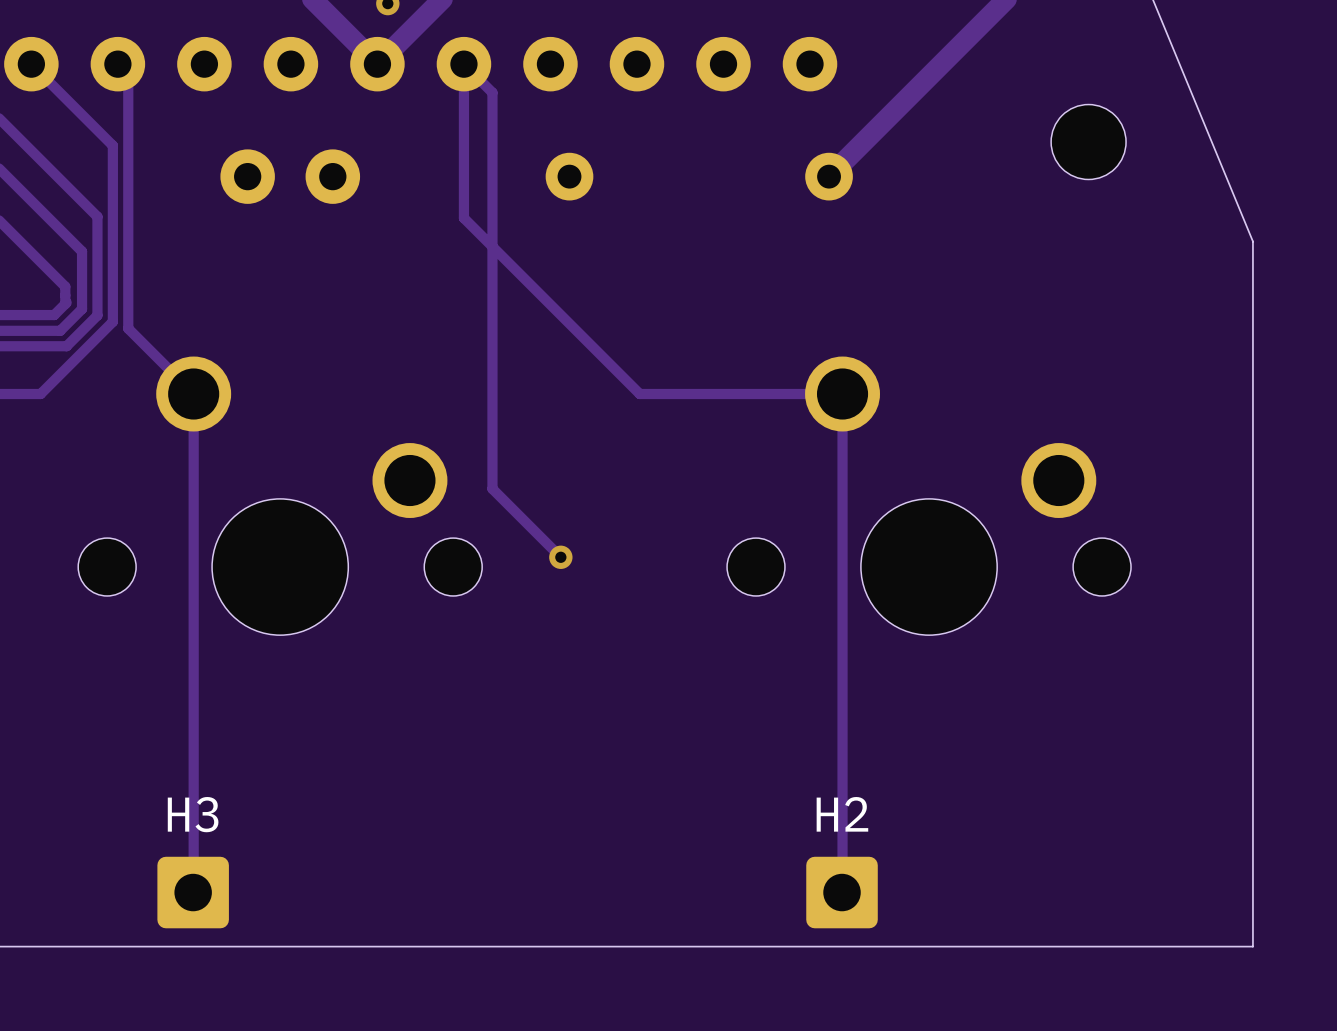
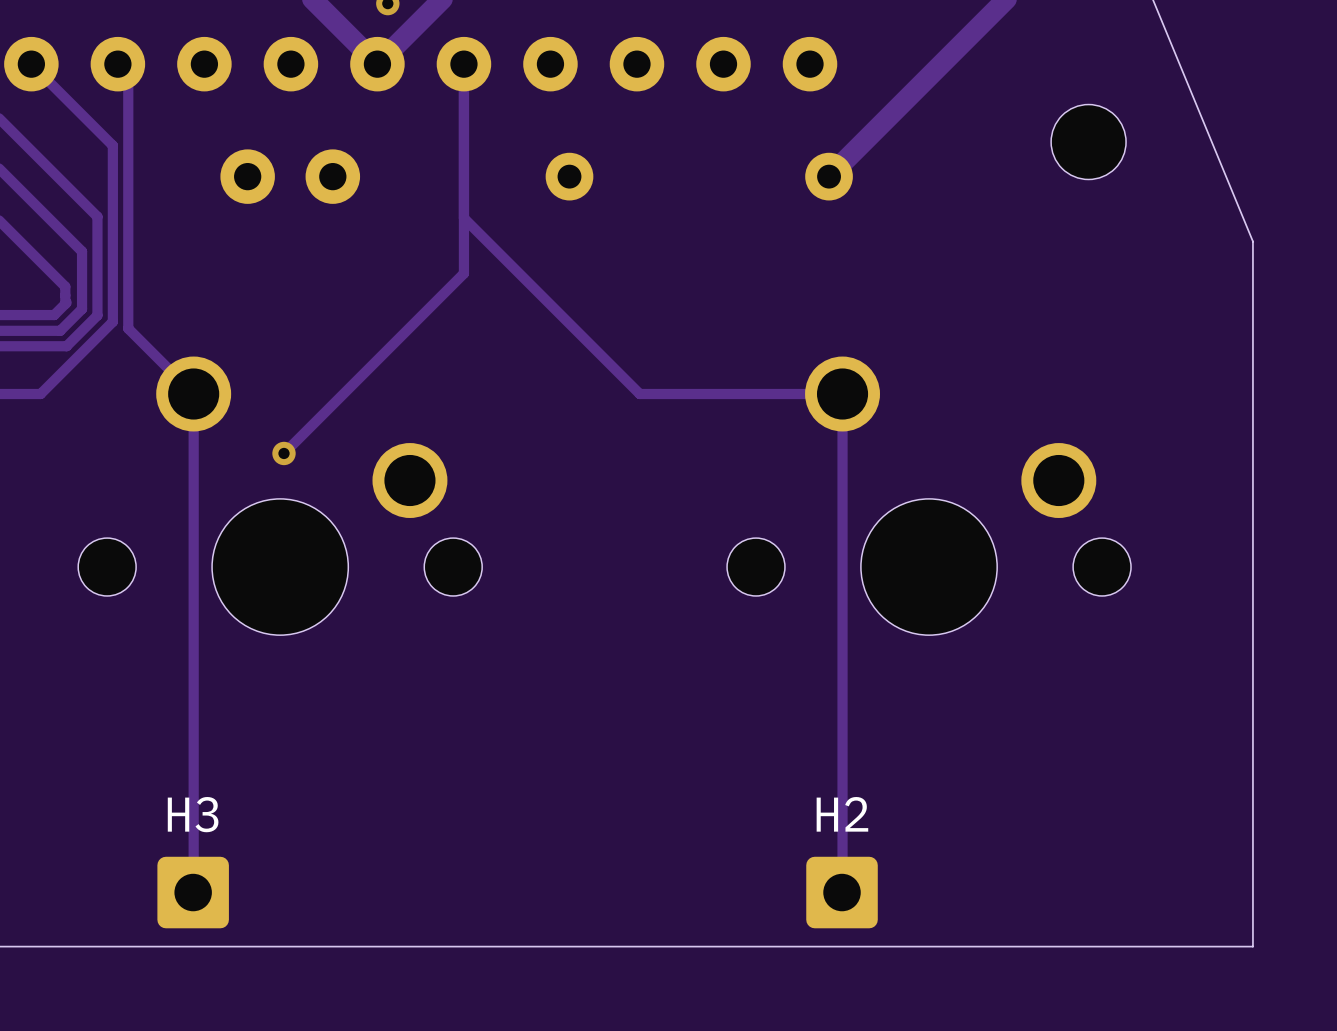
track: (463, 64) (492, 92) (492, 488) (560, 557) -> none
track: none -> (463, 218) (463, 273) (284, 453)
via: none -> (284, 453)
via: (560, 557) -> none

